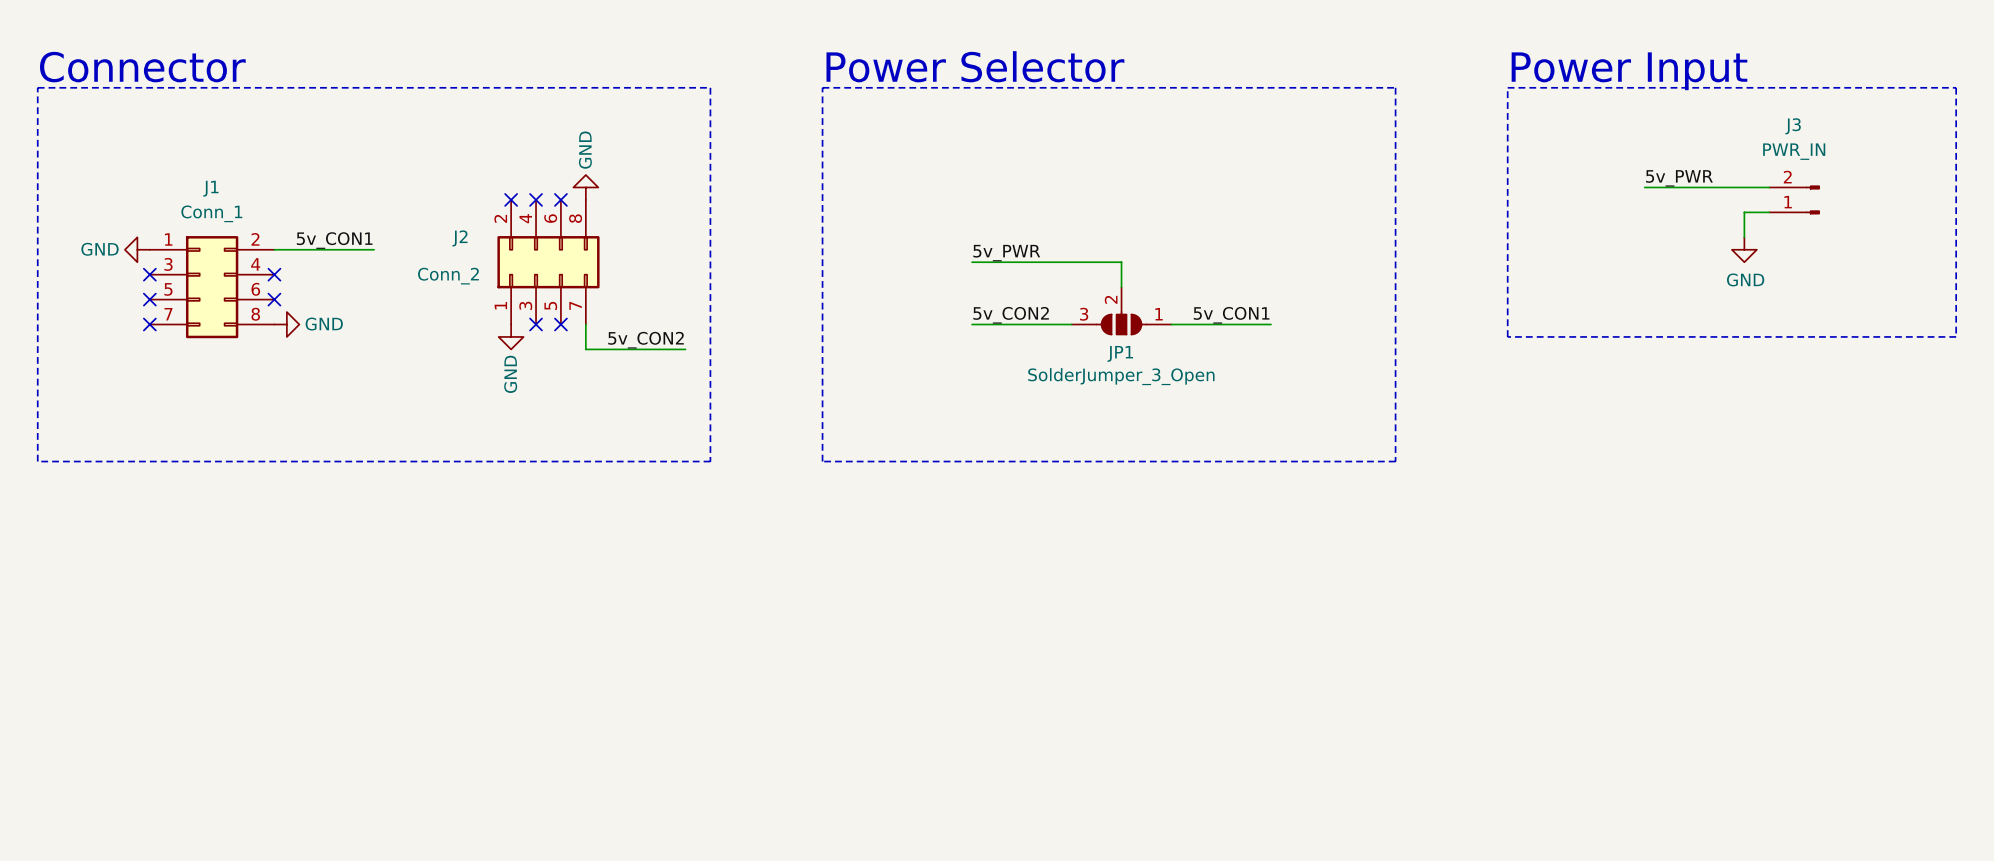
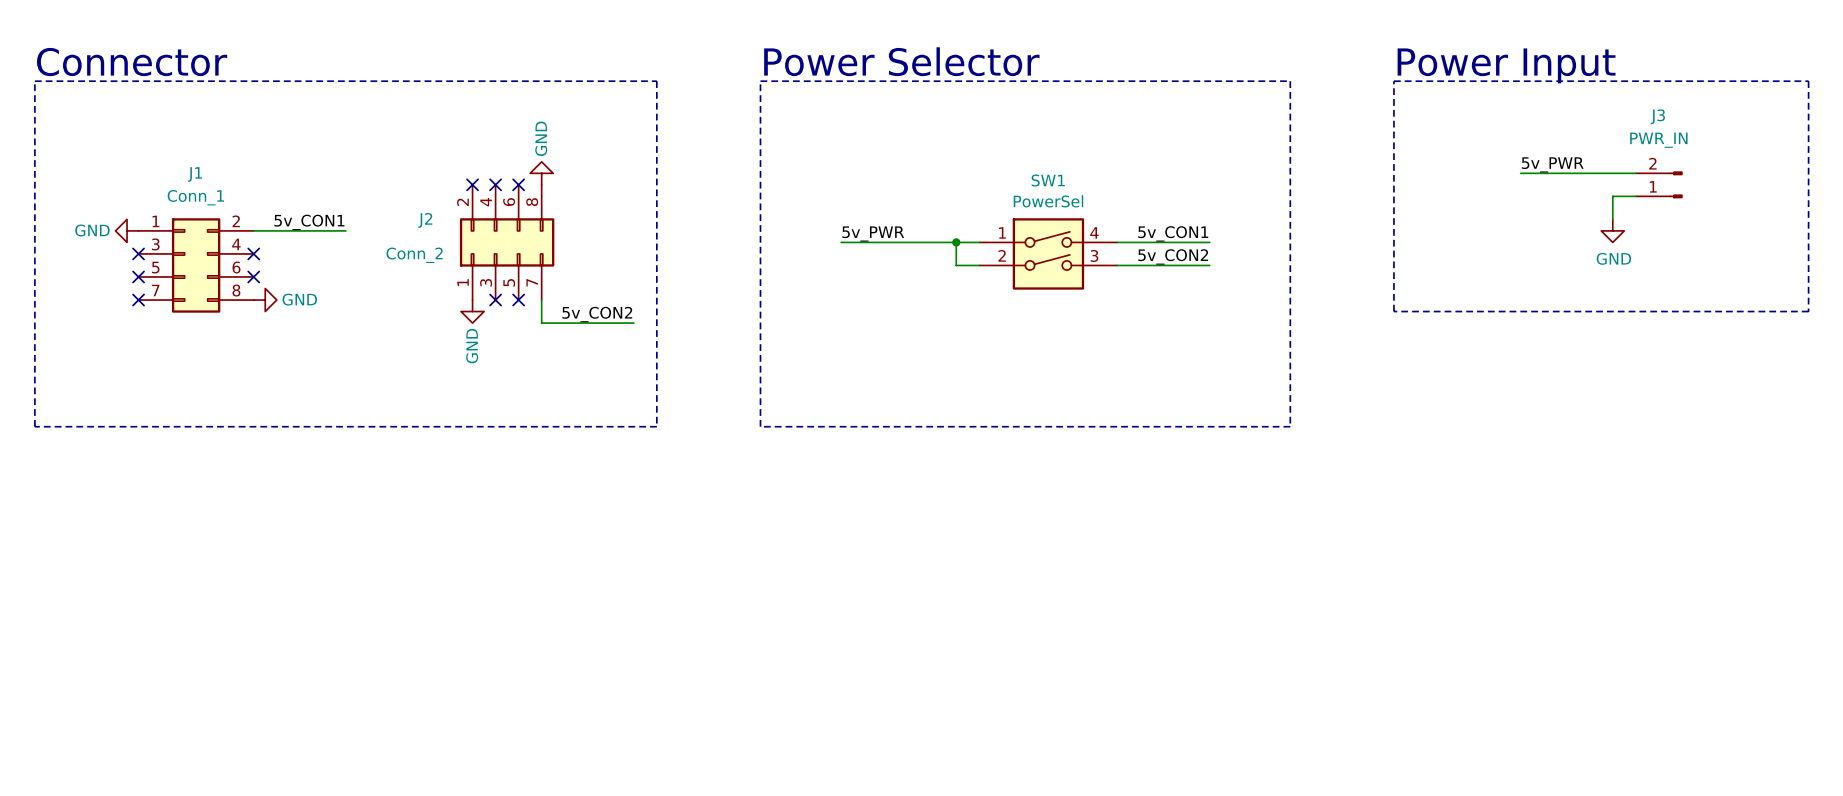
label position: 5v_PWR (1006, 253) -> 5v_PWR (873, 234)
wire: none -> (841, 242) (898, 242)
wire: none -> (956, 242) (956, 265) (979, 265)
junction: none -> (956, 242)
SW1: none -> PowerSel (1048, 253)
label: none -> 5v_CON2 (1173, 256)
JP1: SolderJumper_3_Open (1121, 310) -> none
label: 5v_CON2 (1011, 315) -> none
label position: 5v_CON1 (1231, 315) -> 5v_CON1 (1173, 233)
wire: (972, 324) (1071, 324) -> (1117, 242) (1209, 242)
wire: (1171, 324) (1271, 324) -> (1117, 265) (1209, 265)

